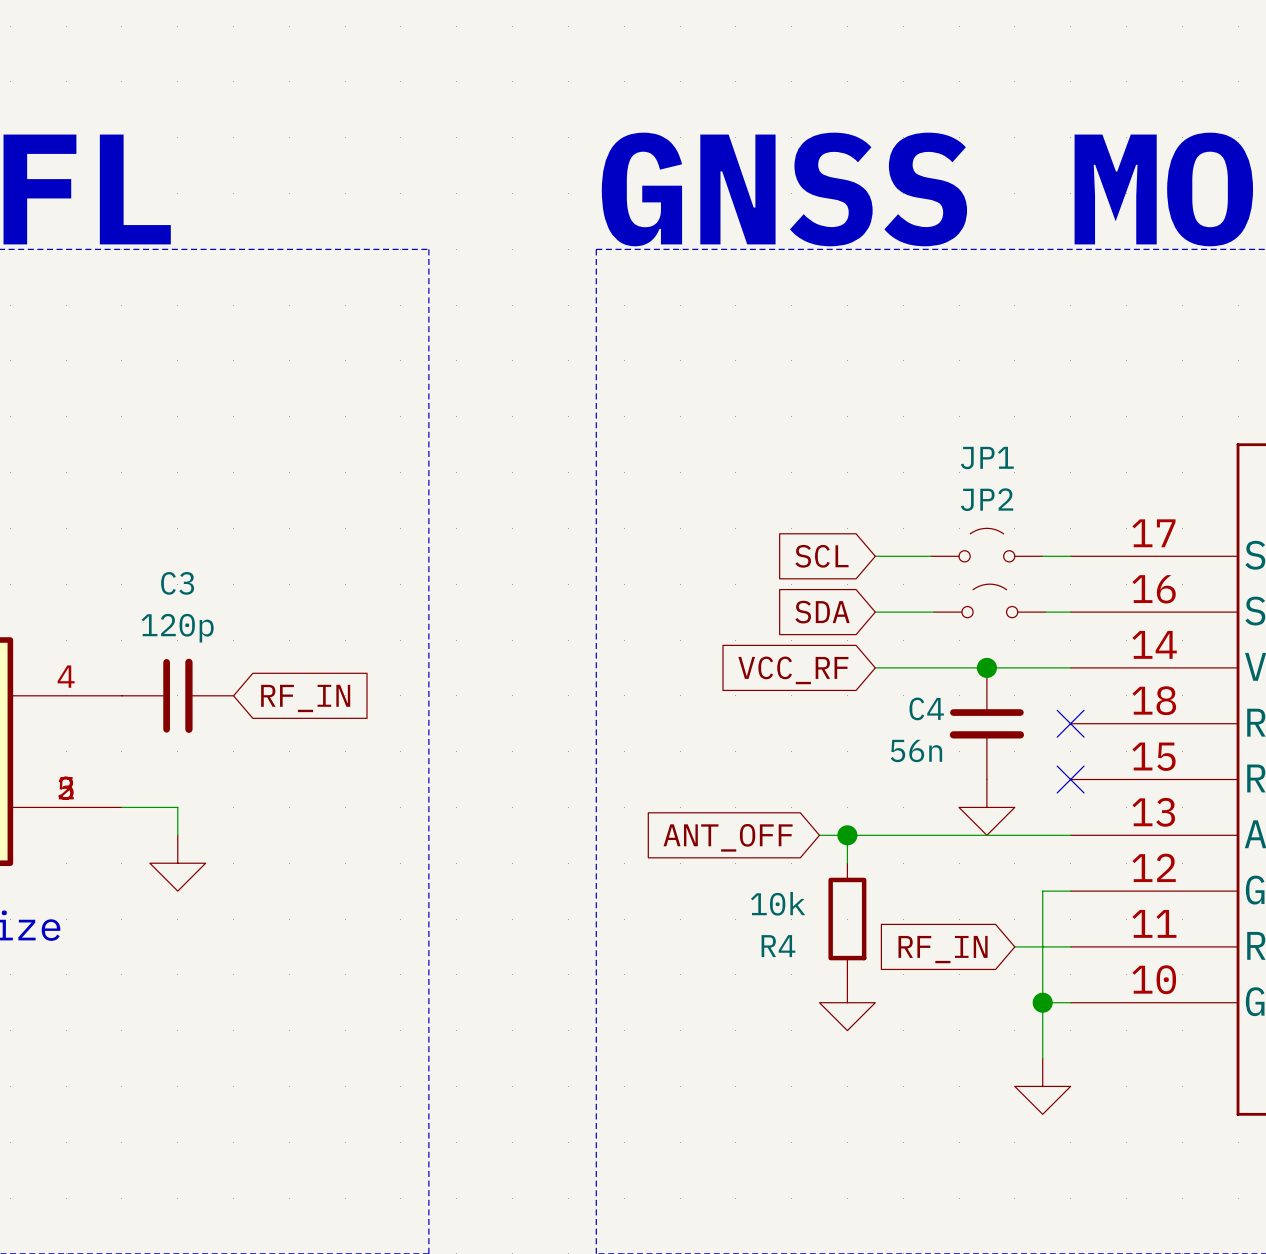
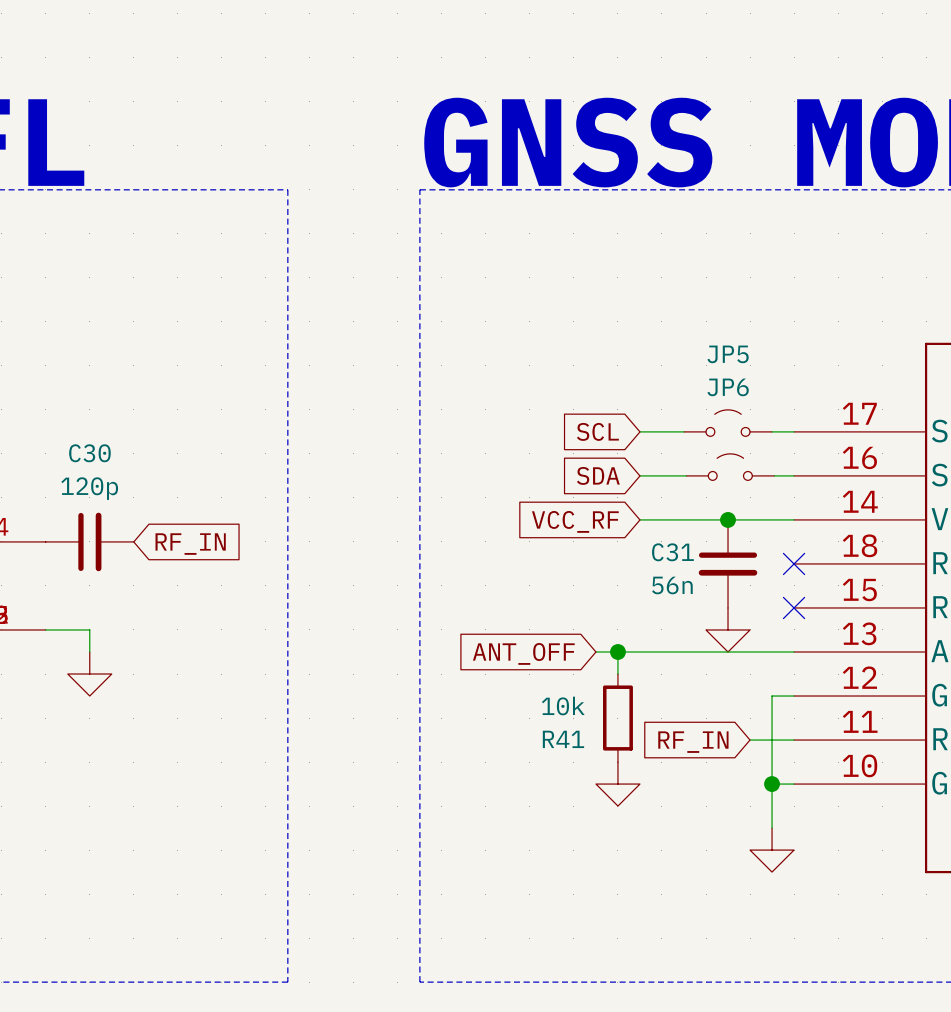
JP1 name: JP1 (987, 458) -> JP5 (728, 354)
JP2 name: JP2 (987, 499) -> JP6 (728, 387)
C3 name: C3 (177, 583) -> C30 (89, 453)
C4 name: C4 (926, 708) -> C31 (672, 552)
R4 name: R4 (778, 946) -> R41 (563, 739)

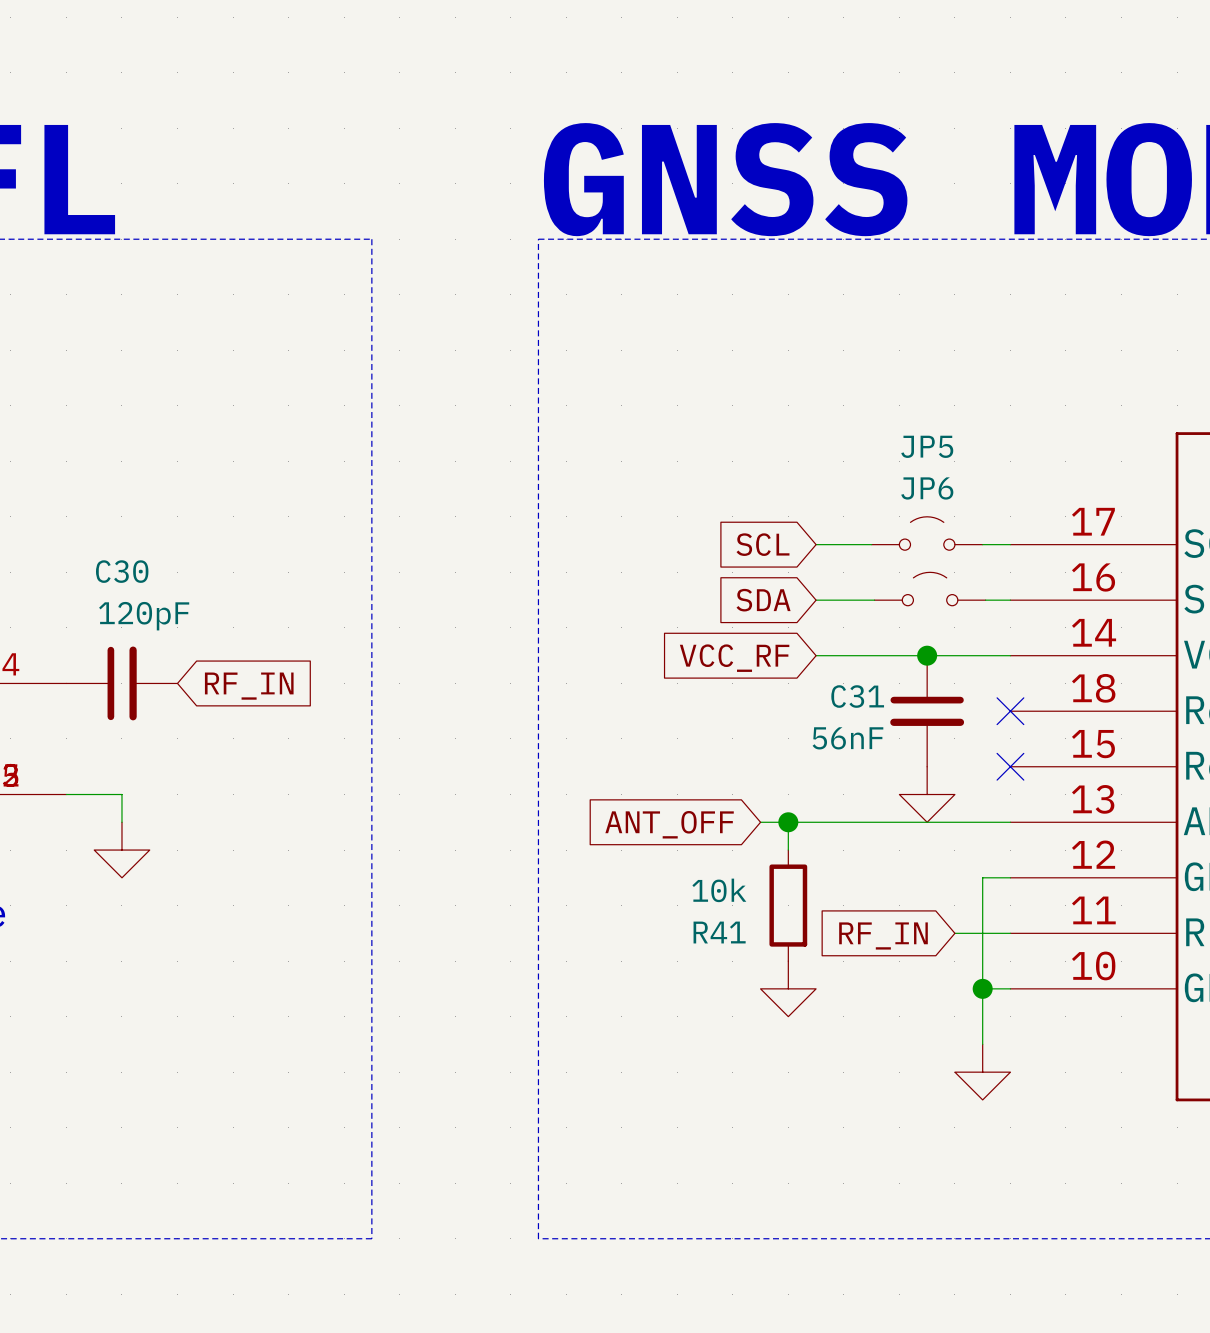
C30 value: 120p (89, 488) -> 120pF (144, 616)
C31 value: 56n (672, 585) -> 56nF (847, 738)

